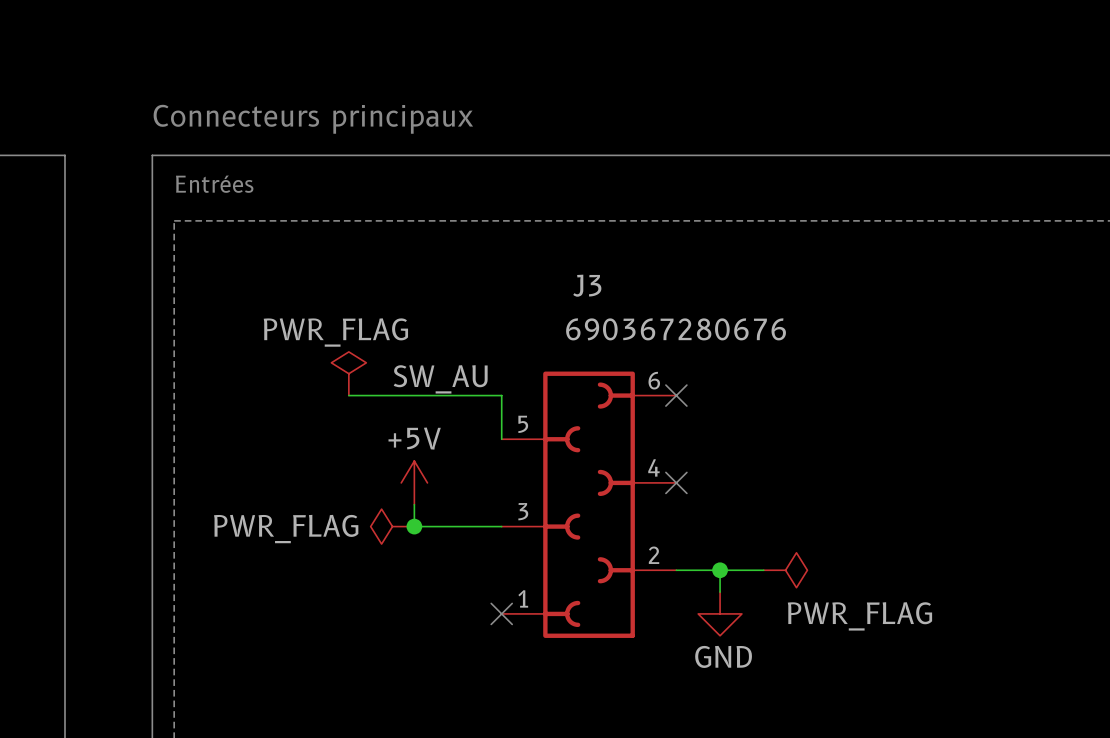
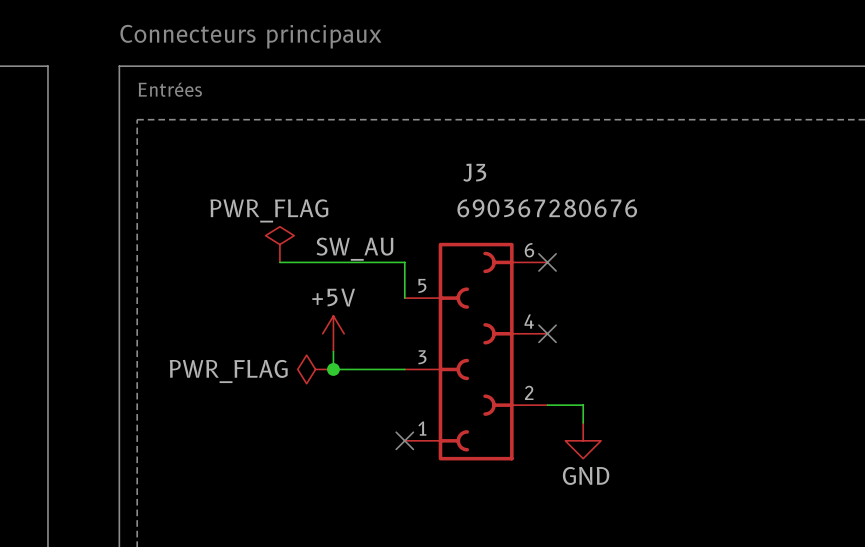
wire: (720, 570) (763, 570) -> none
junction: (720, 570) -> none
power symbol: PWR_FLAG (785, 570) -> none

